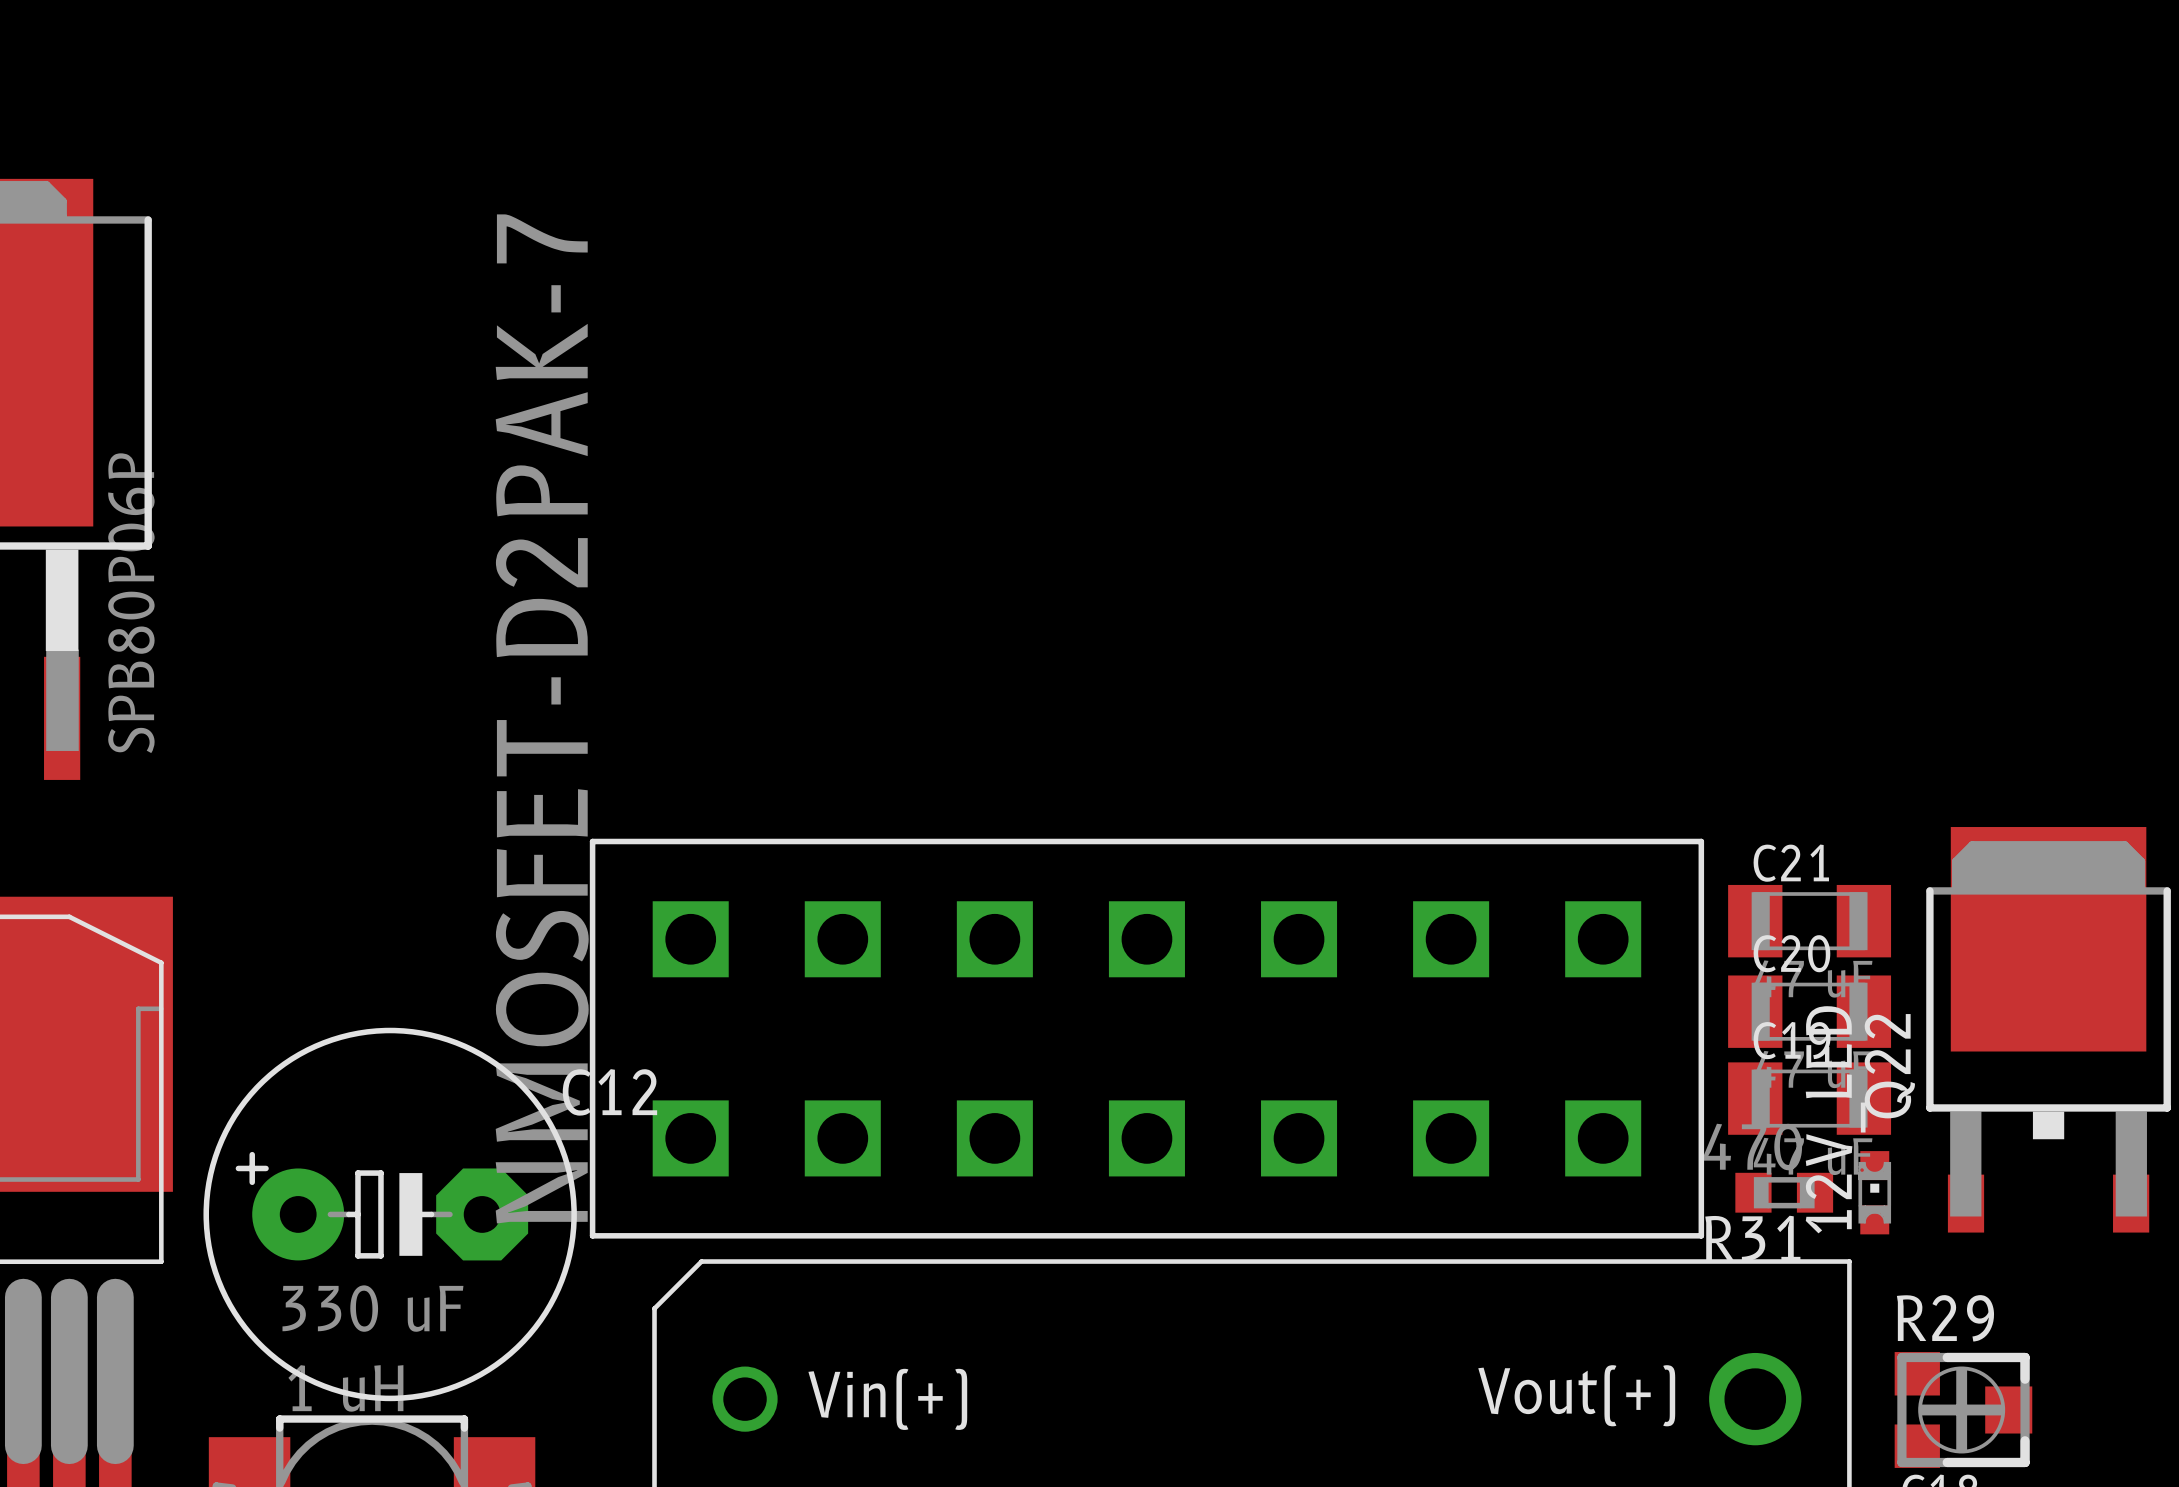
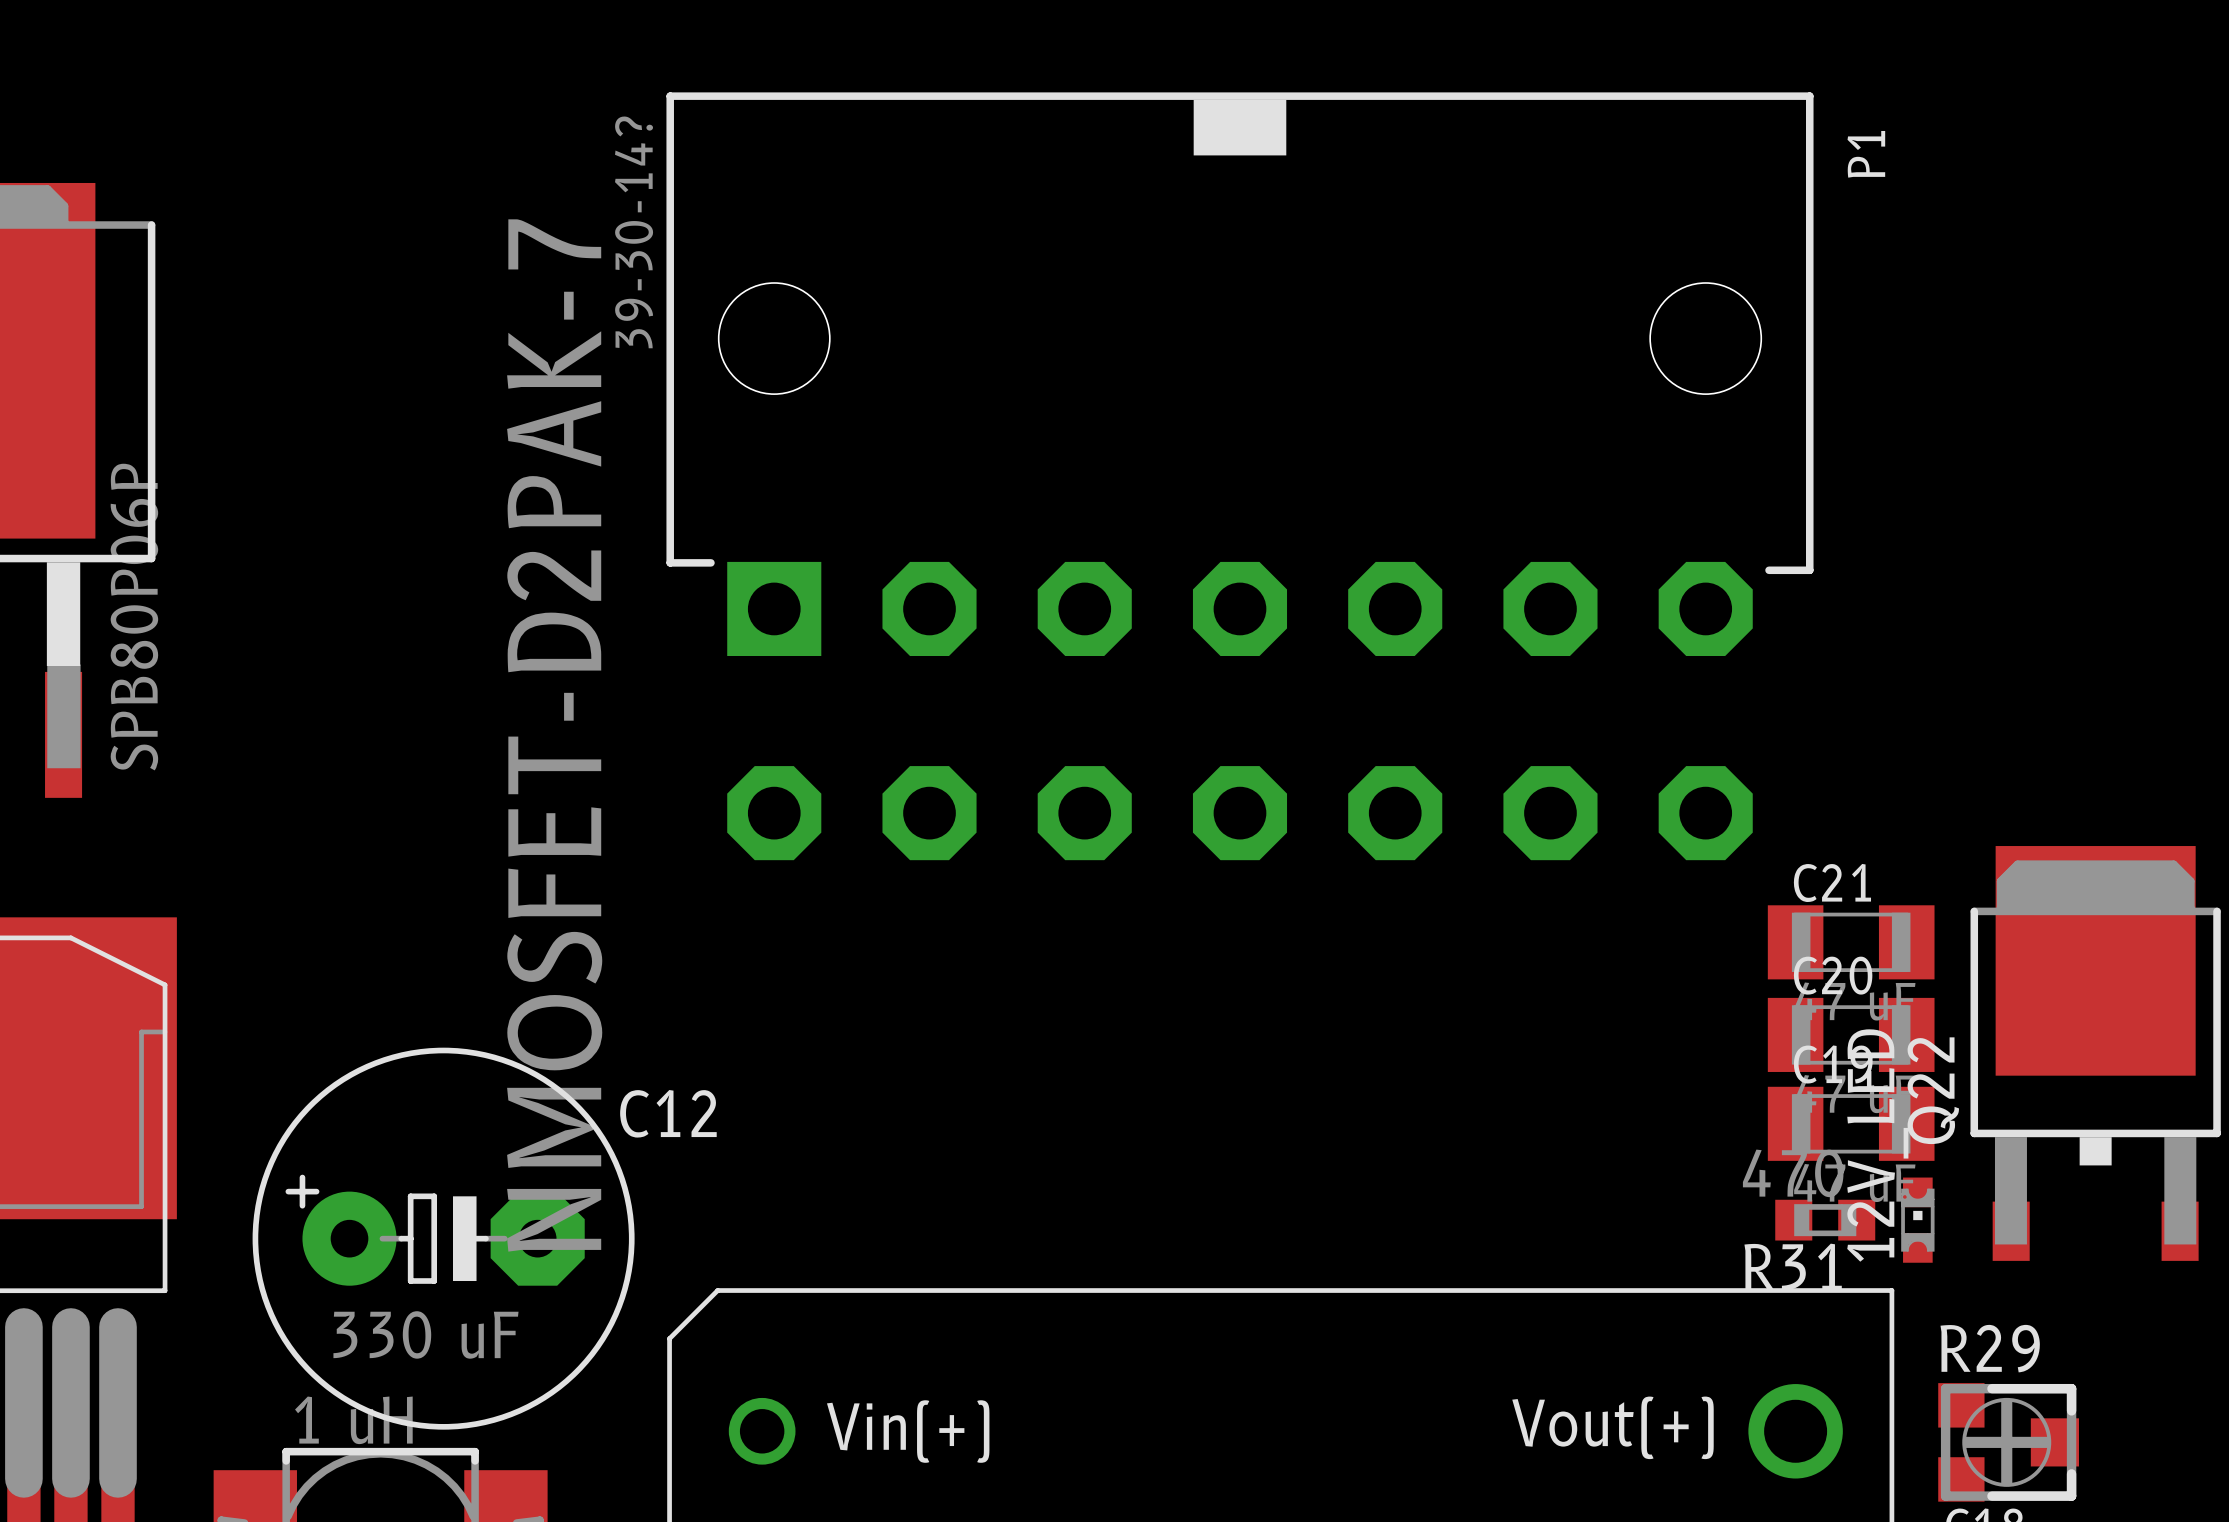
P1: none -> 39-30-14? (1239, 476)
part: (1146, 1038) -> none
C12 position: (390, 1214) -> (443, 1238)

